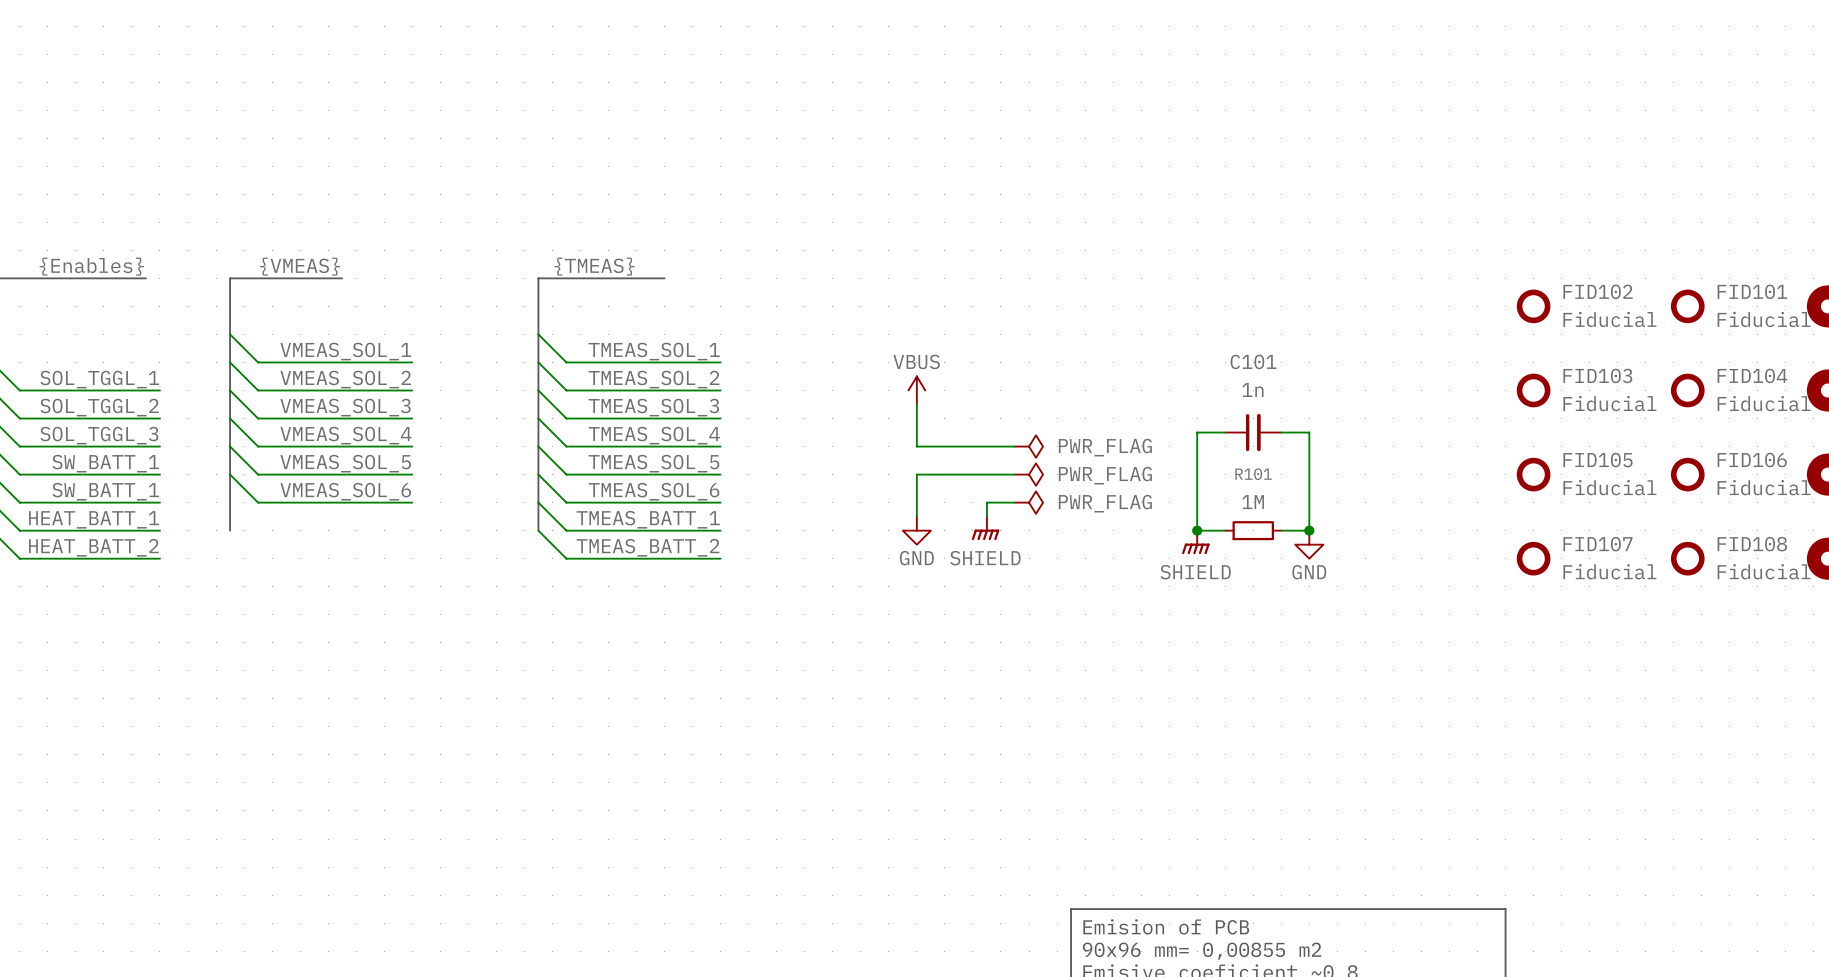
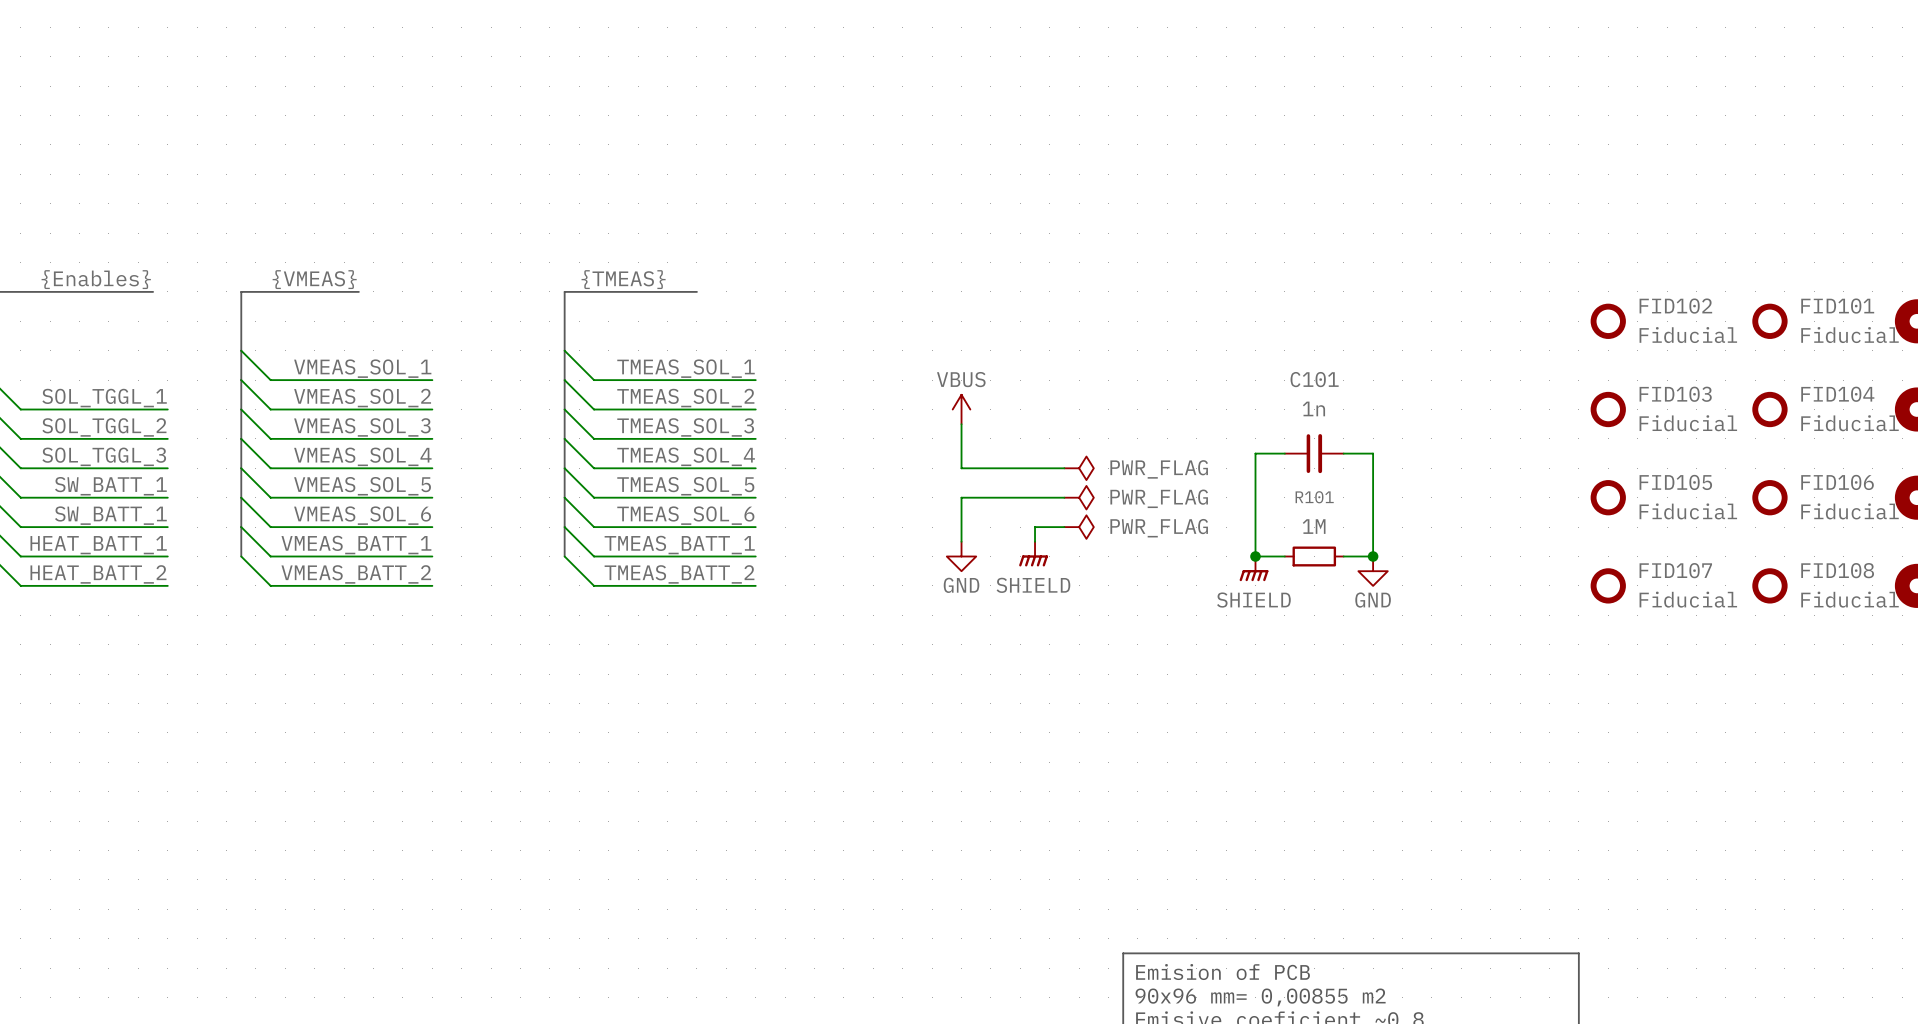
wire: none -> (241, 527) (270, 556) (432, 556)
label: none -> VMEAS_BATT_1 (356, 545)
wire: none -> (241, 556) (270, 585) (432, 585)
label: none -> VMEAS_BATT_2 (356, 574)

